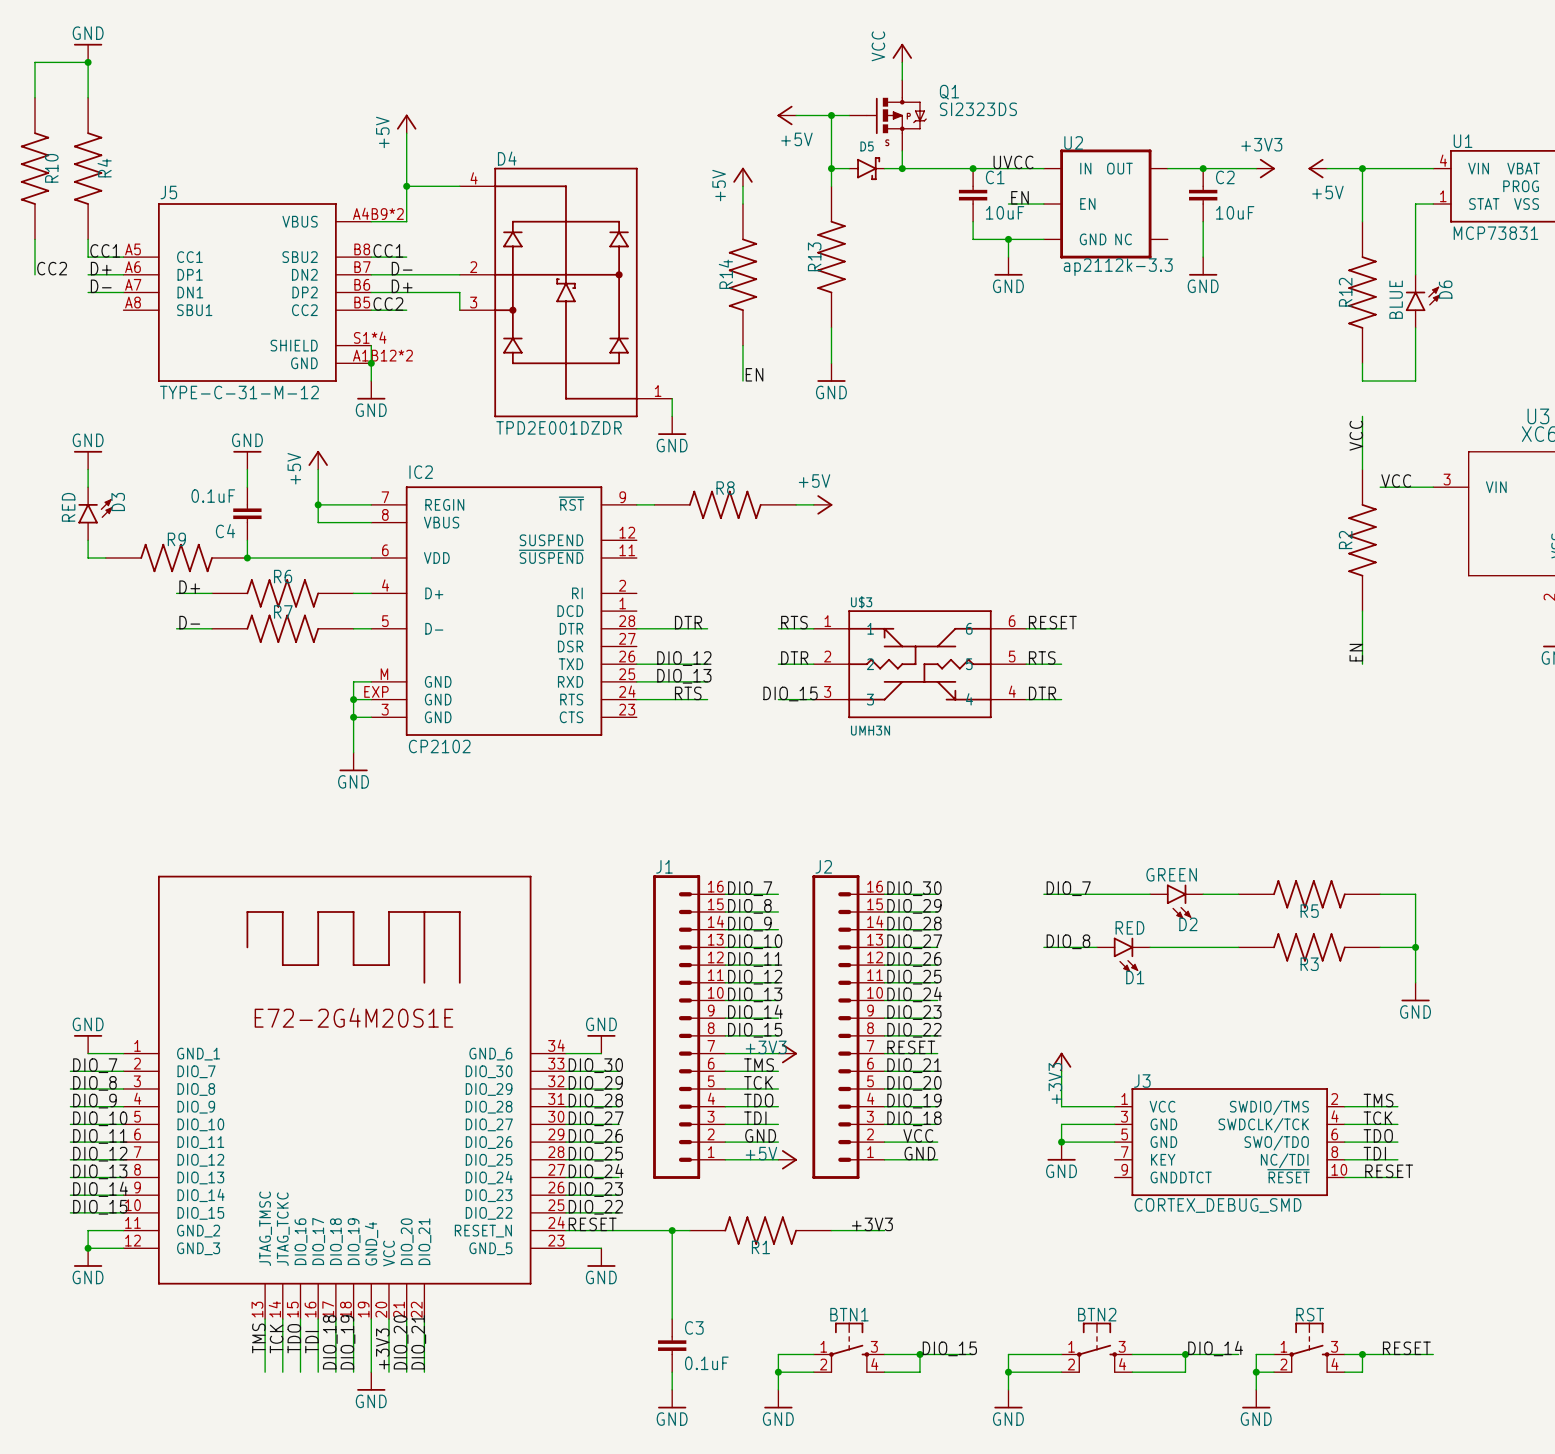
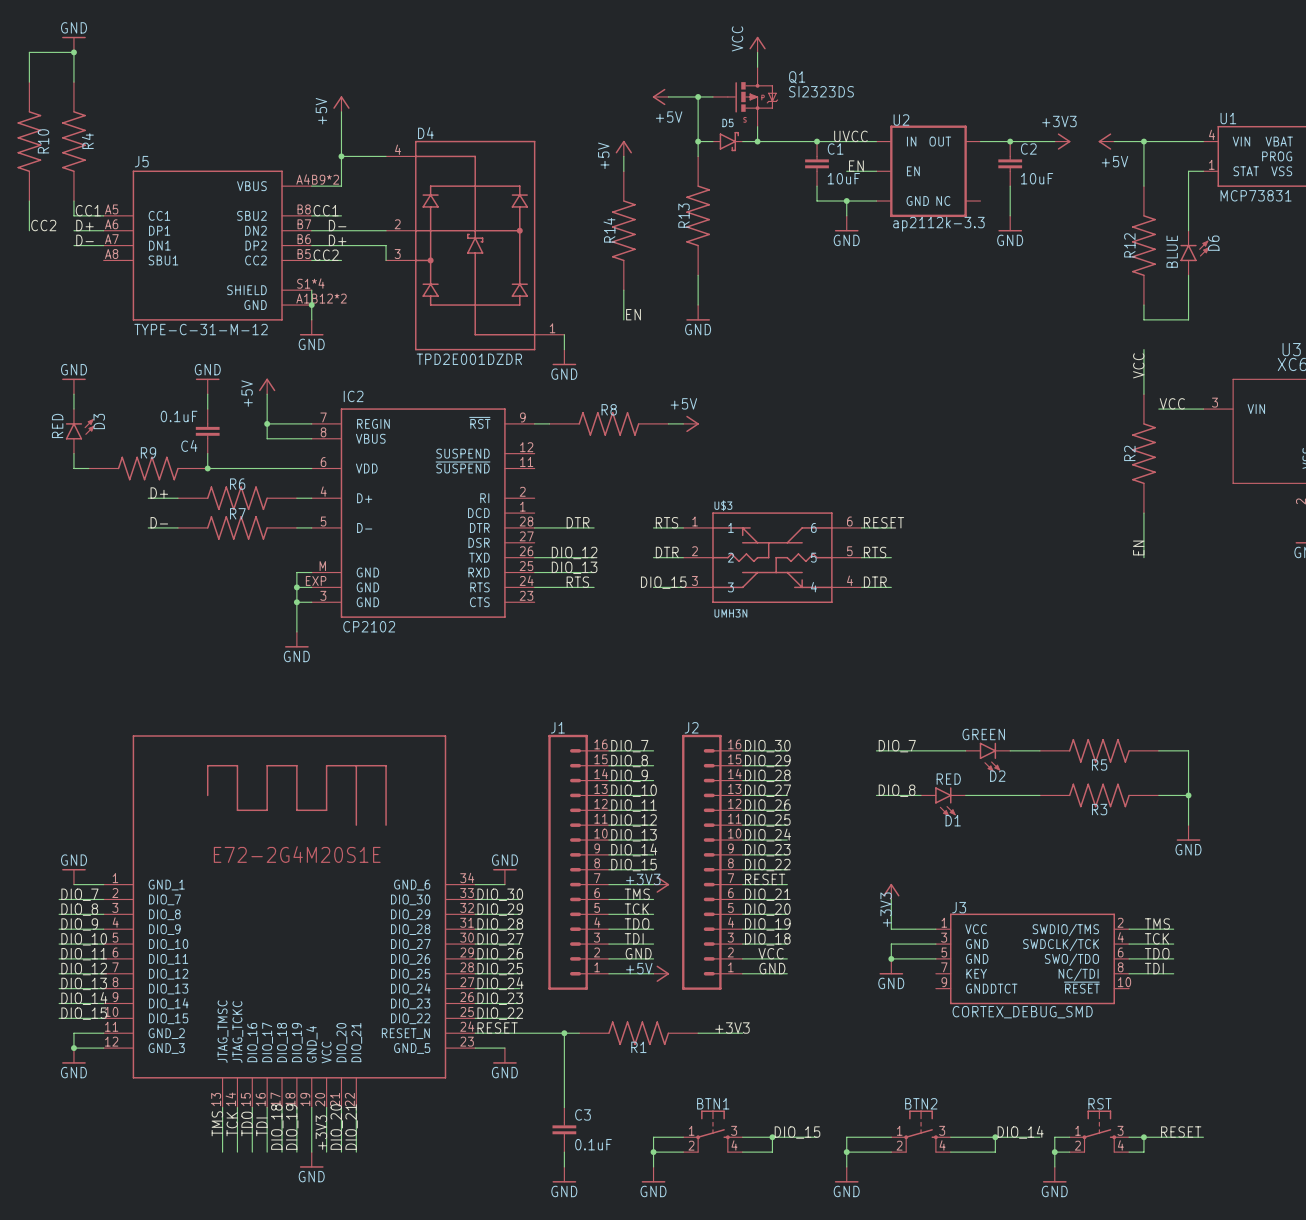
label: RESET (1389, 1171) -> none
wire: (1344, 1177) (1397, 1177) -> none

